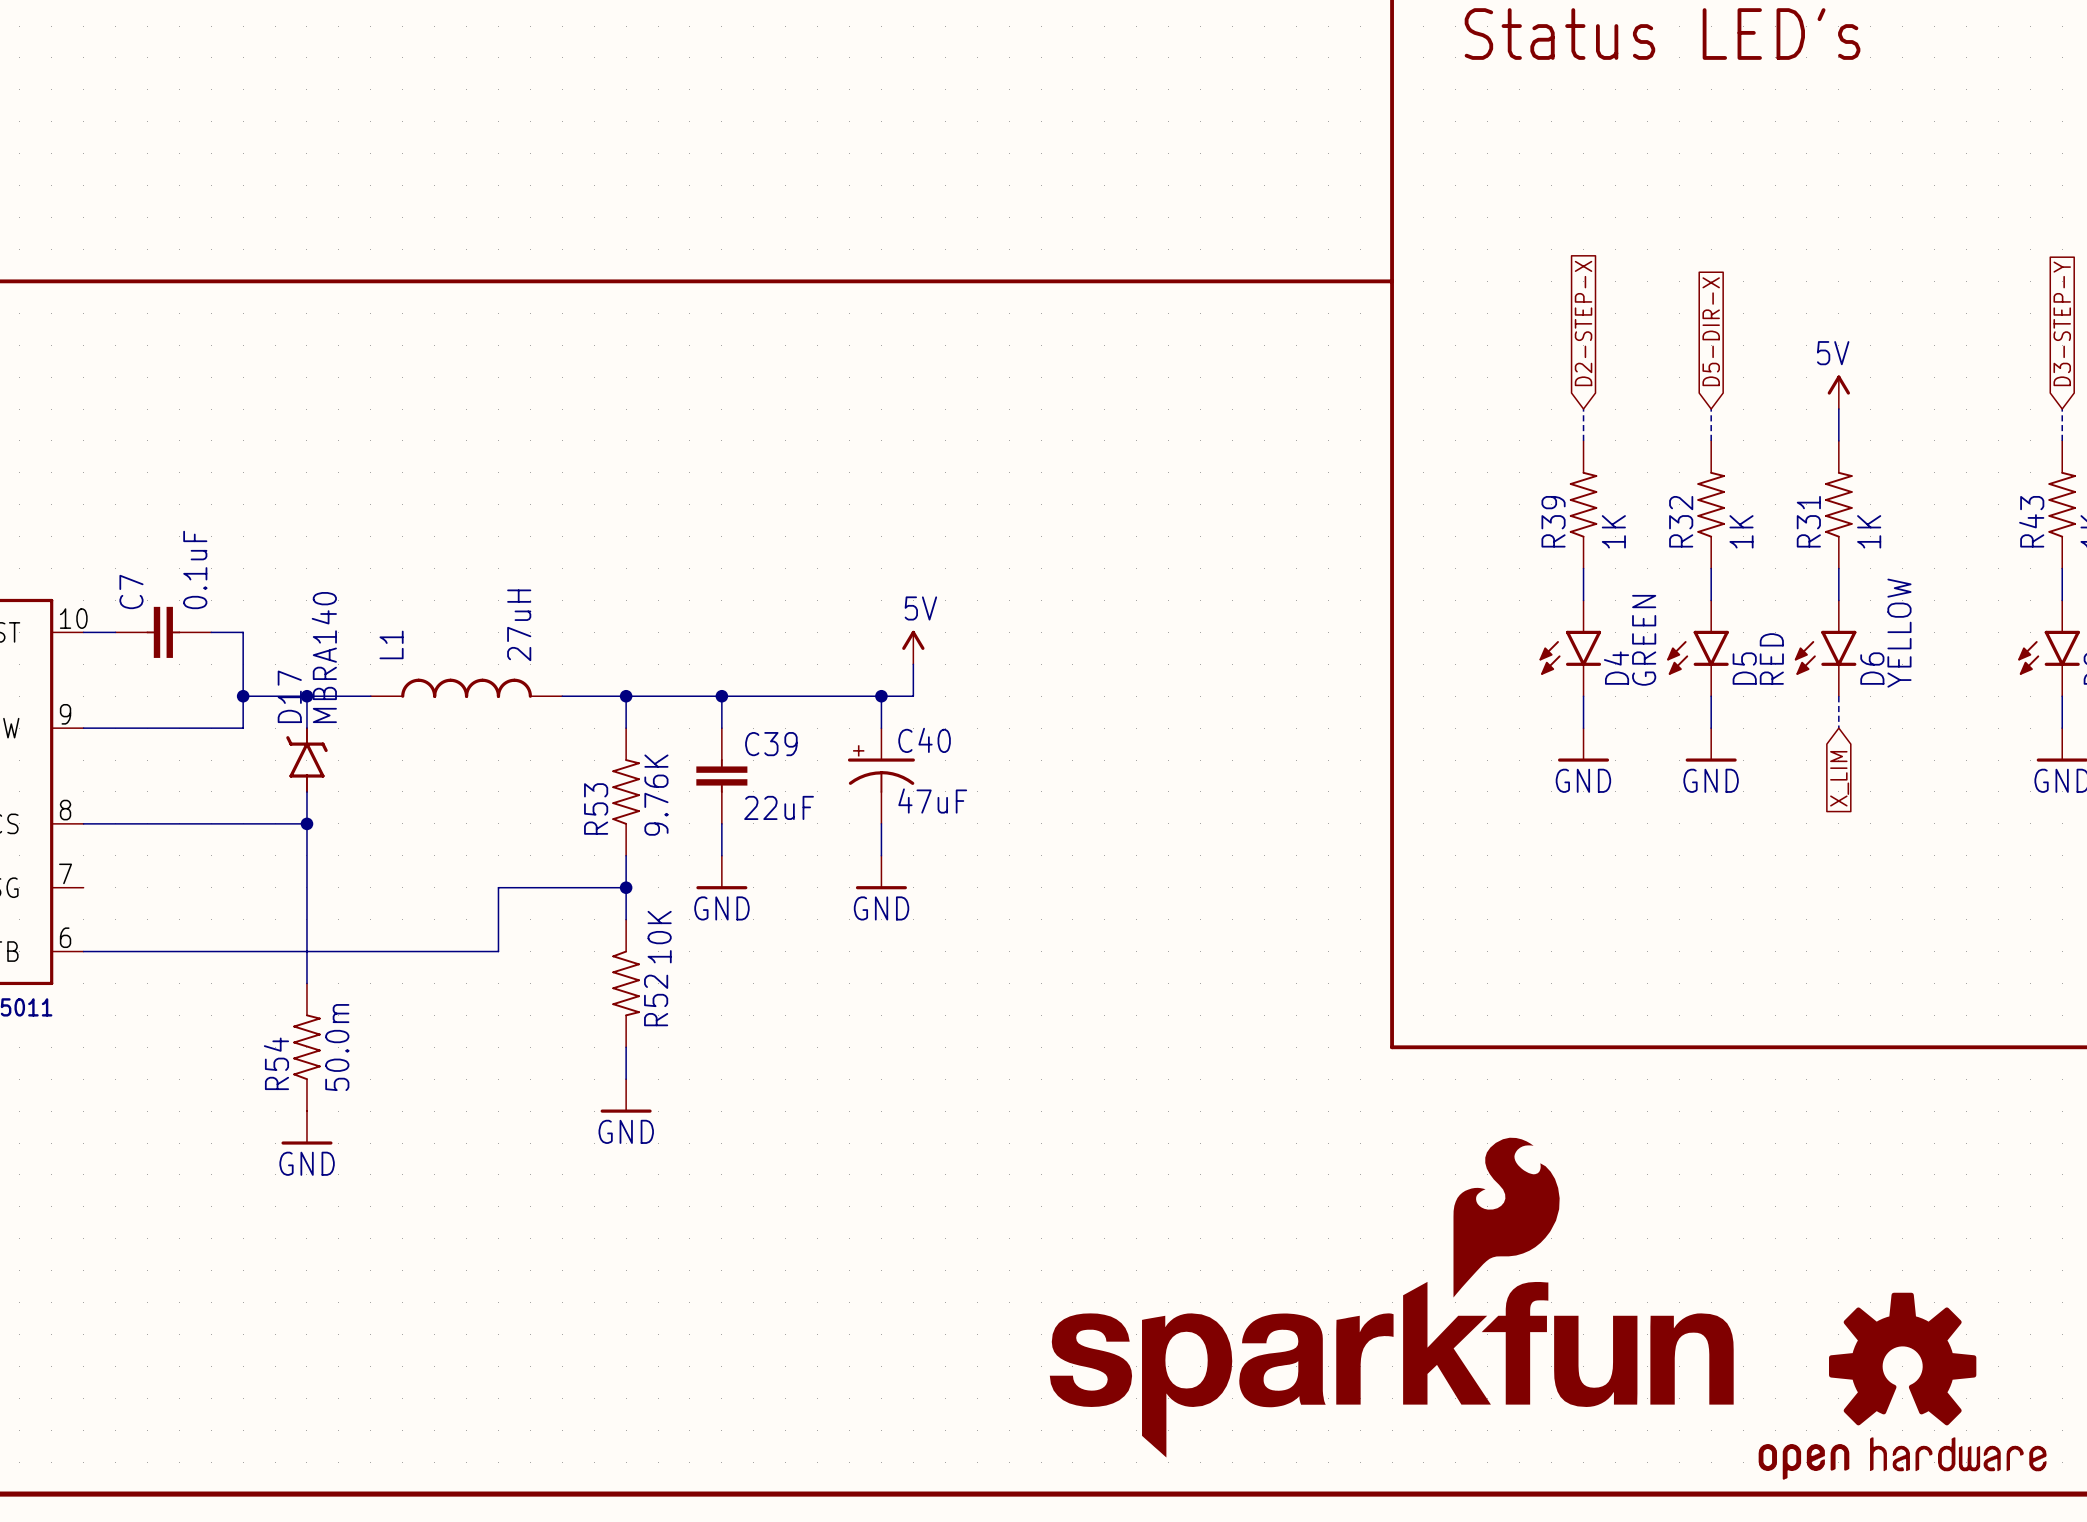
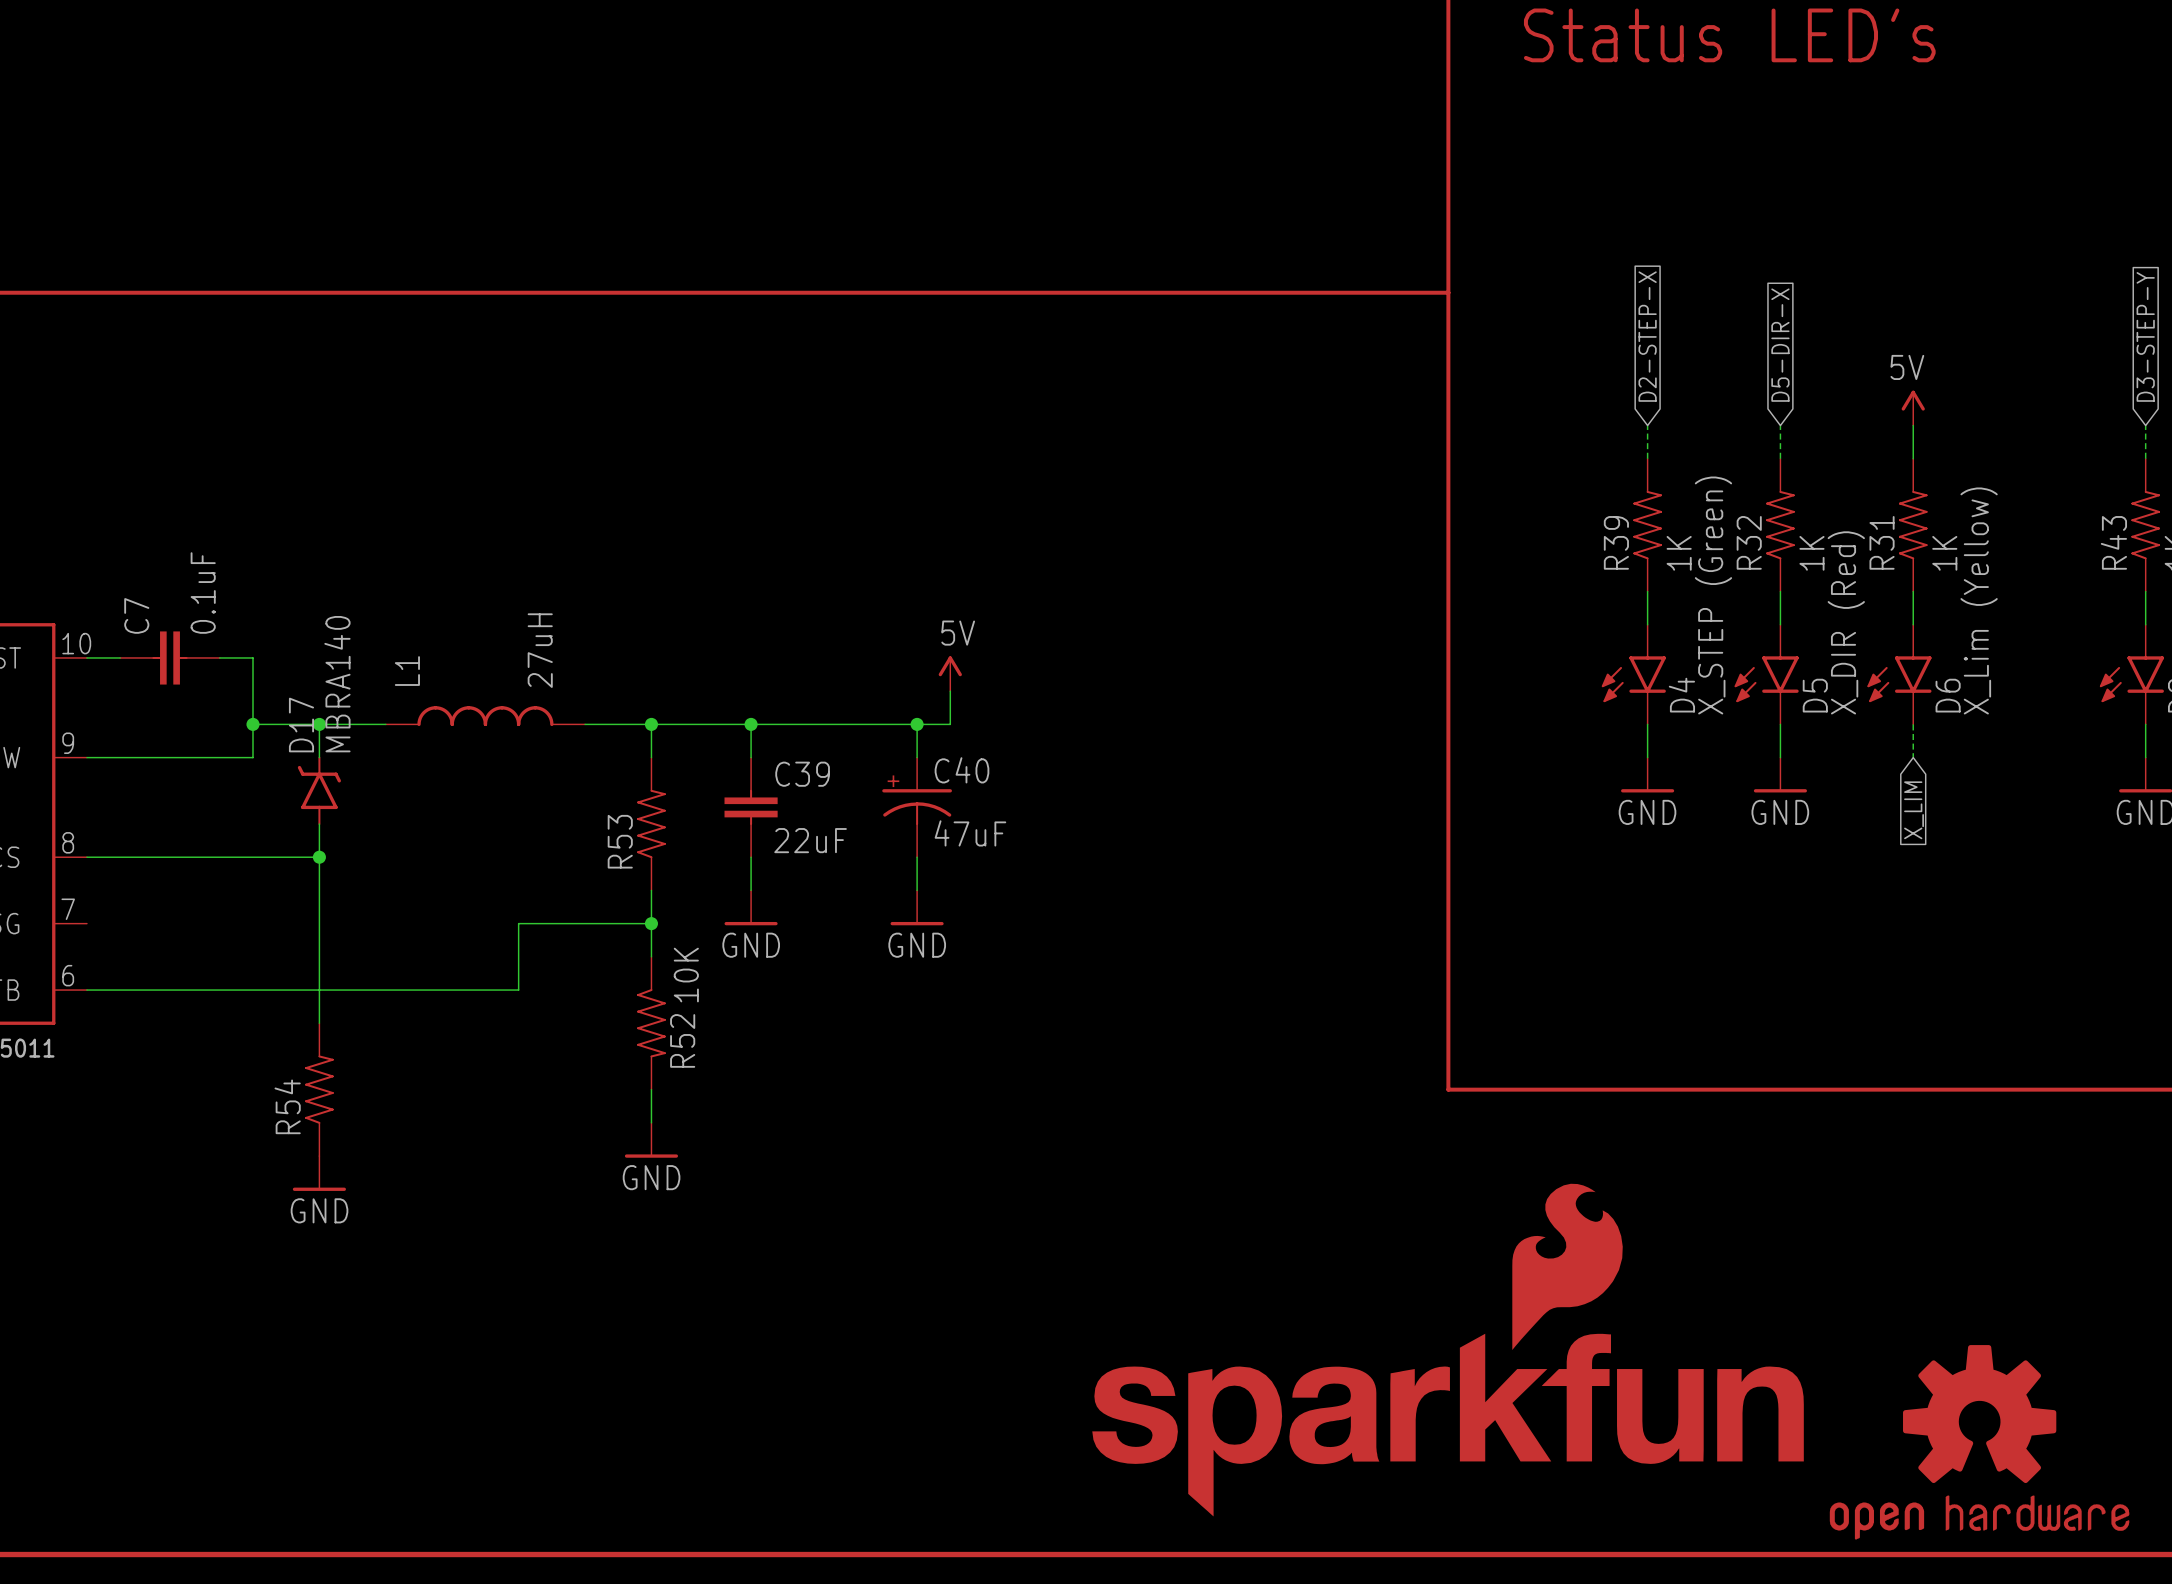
D6 value: YELLOW (1899, 633) -> X_Lim (Yellow) (1979, 600)
D4 value: GREEN (1644, 640) -> X_STEP (Green) (1713, 595)
D5 value: RED (1771, 658) -> X_DIR (Red) (1846, 622)
R53 value: 9.76K (656, 795) -> none
R54 value: 50.0m (337, 1047) -> none

